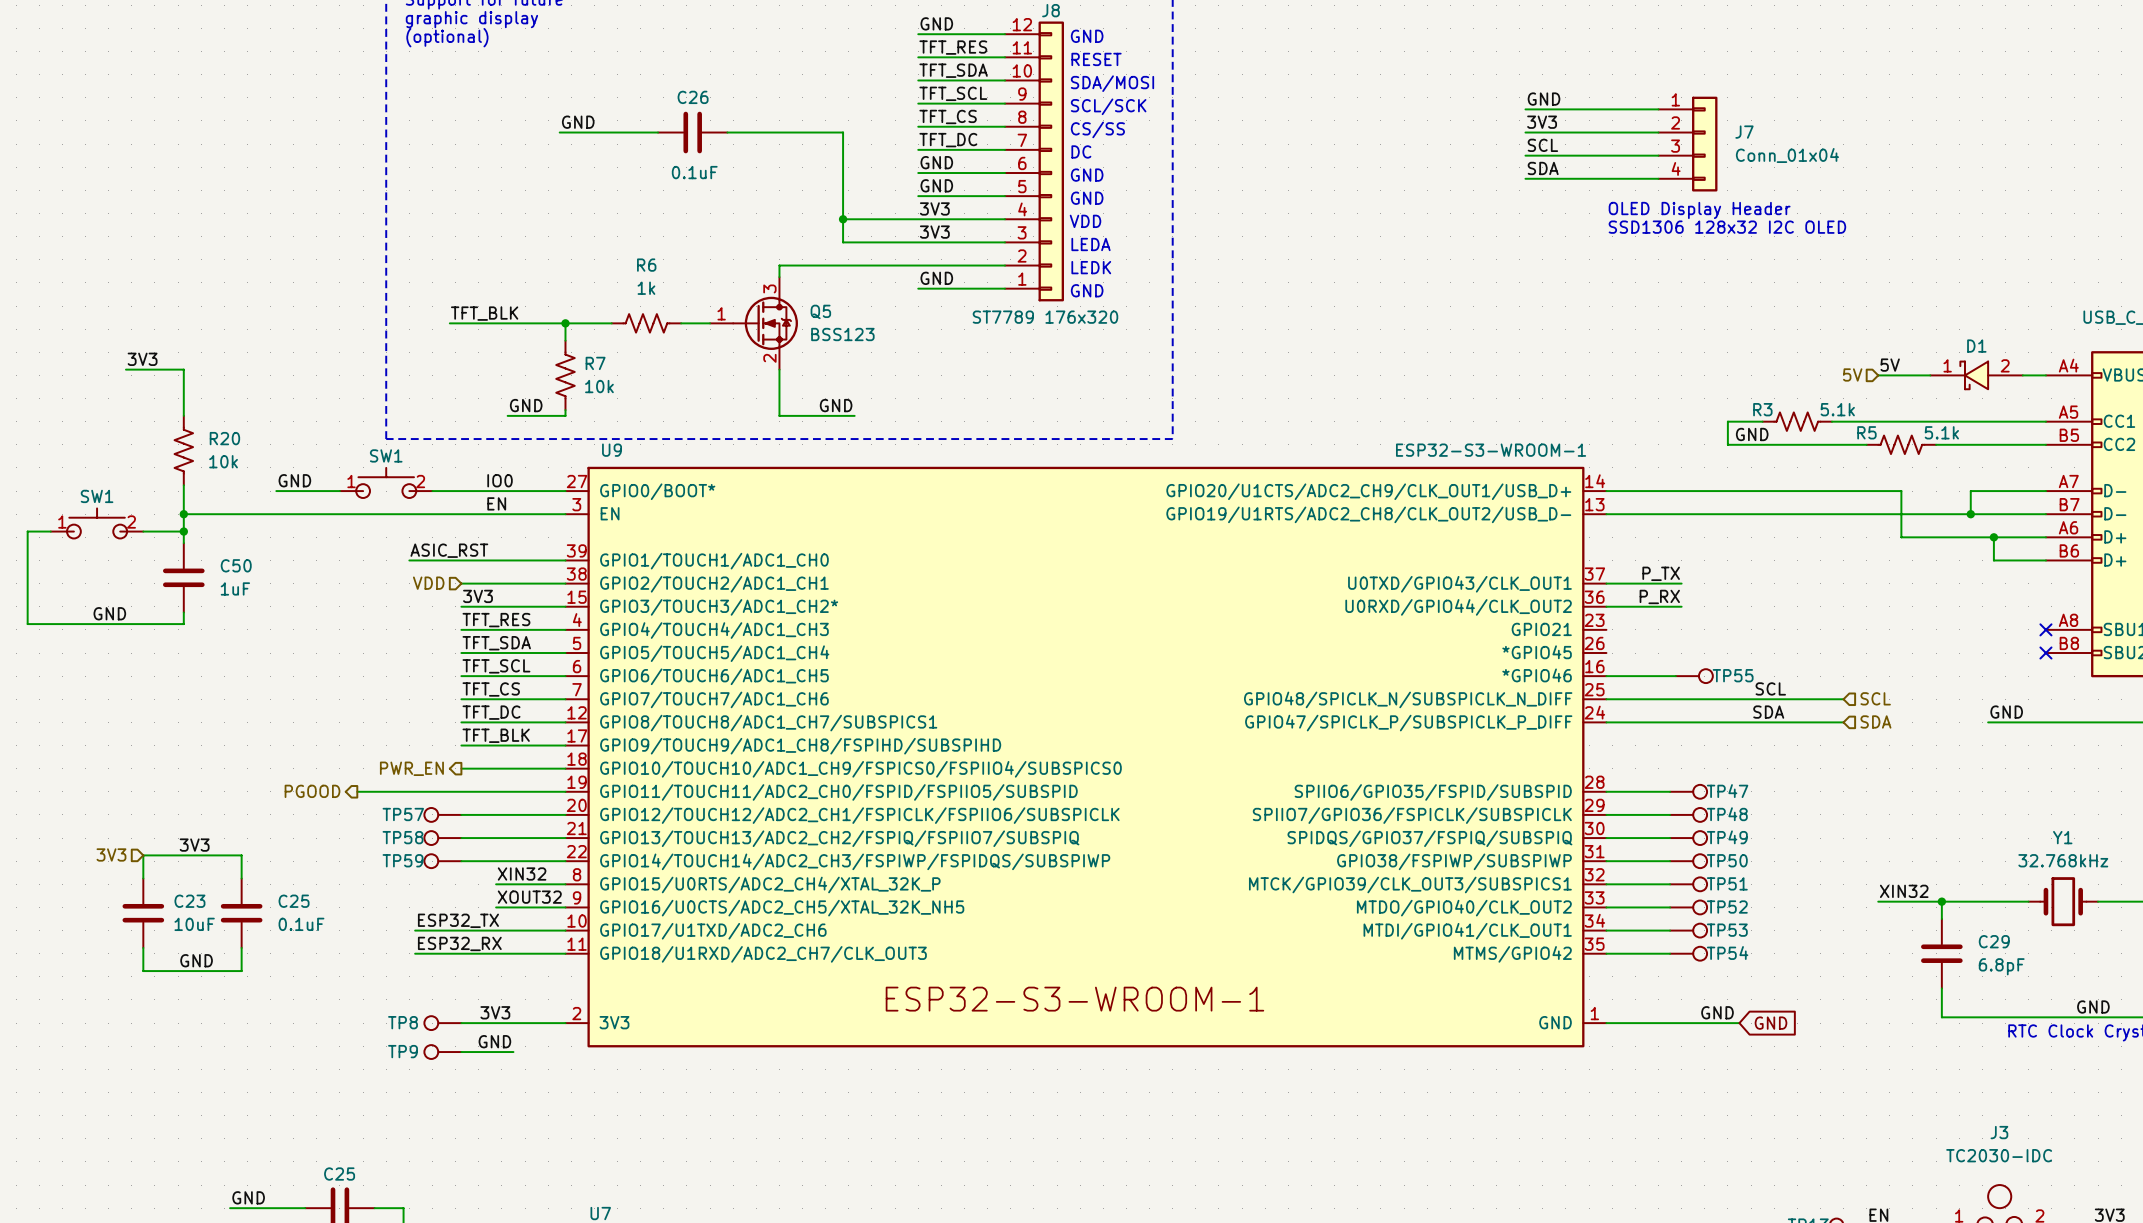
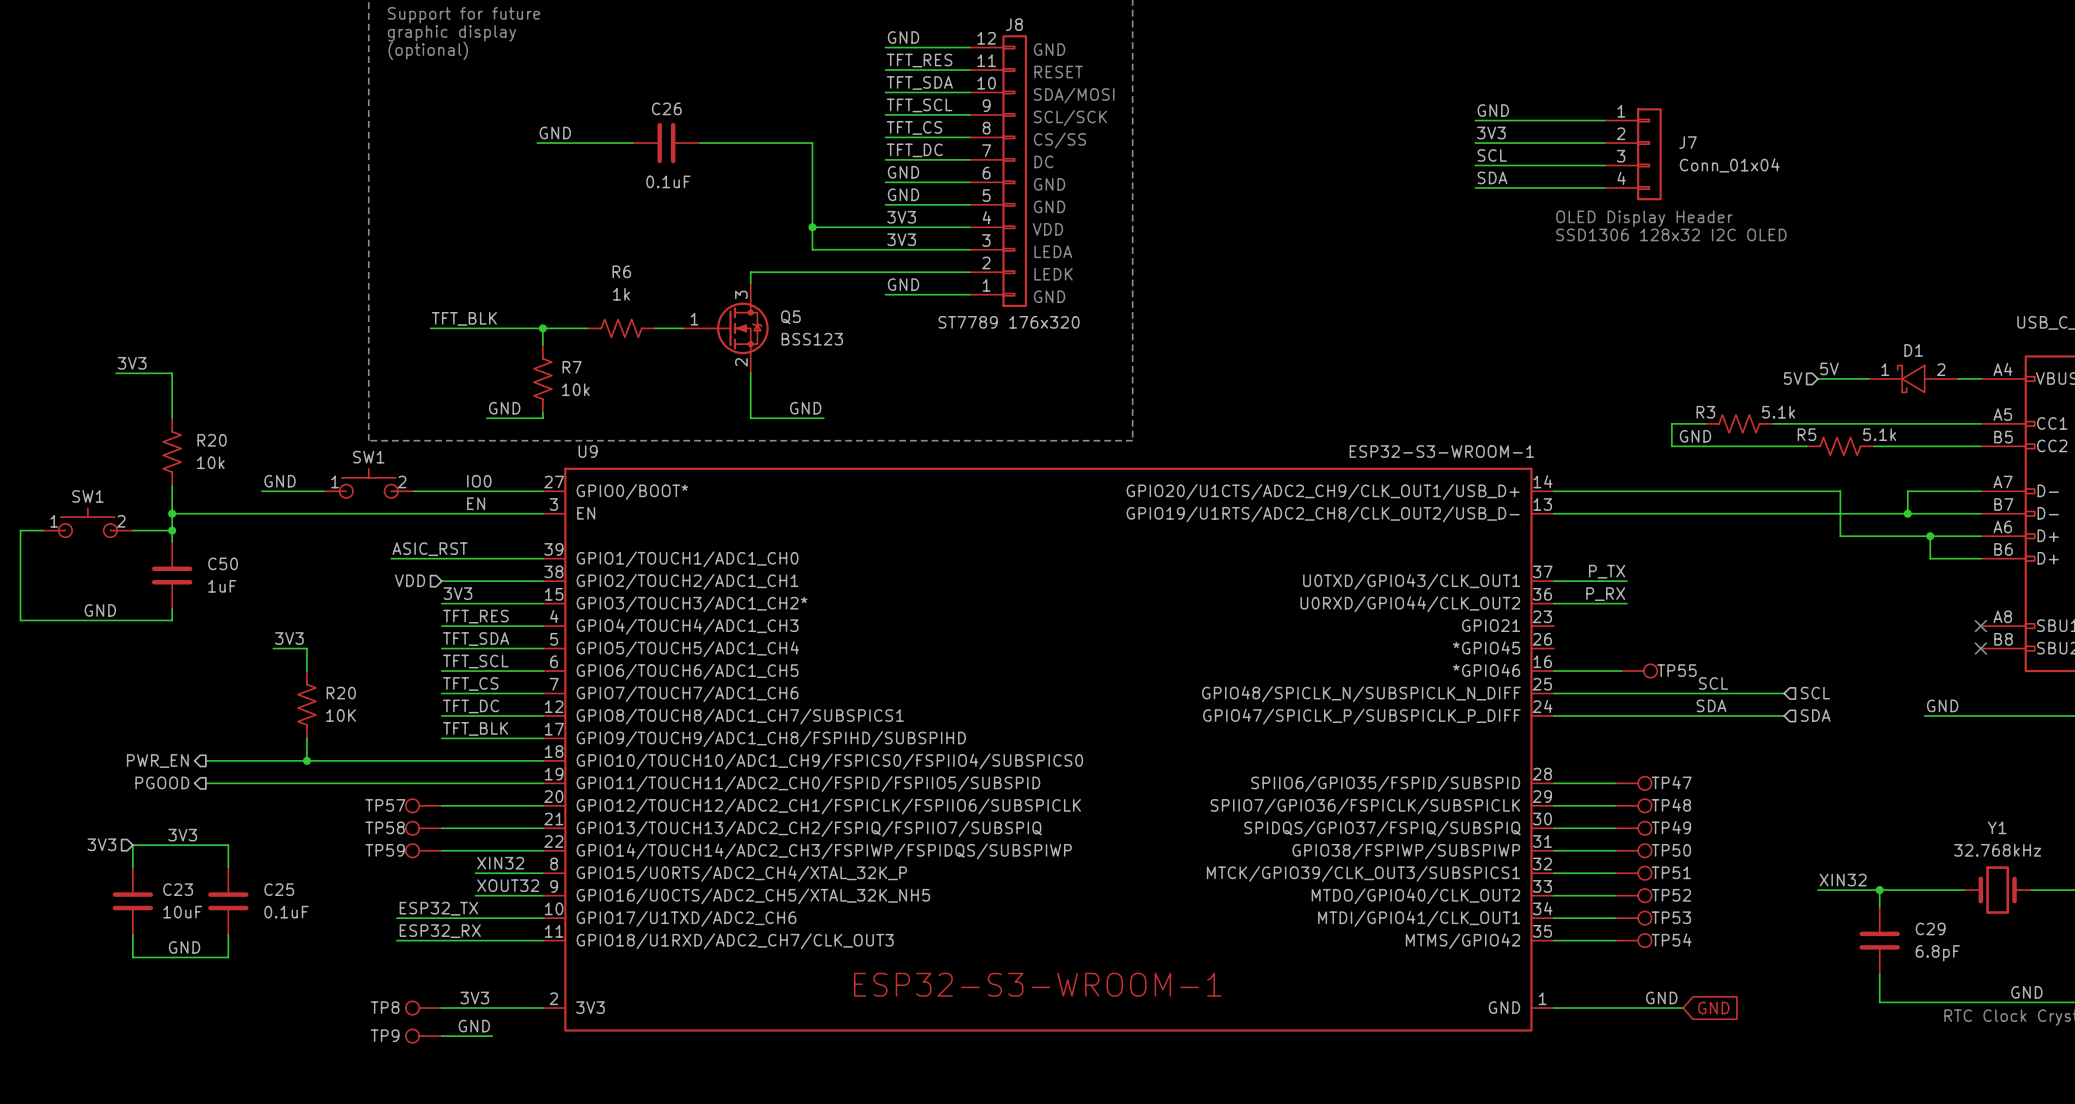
label: none -> 3V3 (289, 638)
wire: none -> (273, 648) (306, 648) (306, 671)
R20: none -> 10K (306, 704)
wire: none -> (306, 738) (306, 760)
hierarchical label: none -> PWR_EN (157, 761)
wire: none -> (205, 760) (441, 760)
junction: none -> (306, 760)
hierarchical label: PWR_EN (411, 768) -> none
wire: none -> (205, 783) (340, 783)
hierarchical label position: PGOOD (312, 791) -> PGOOD (162, 782)

